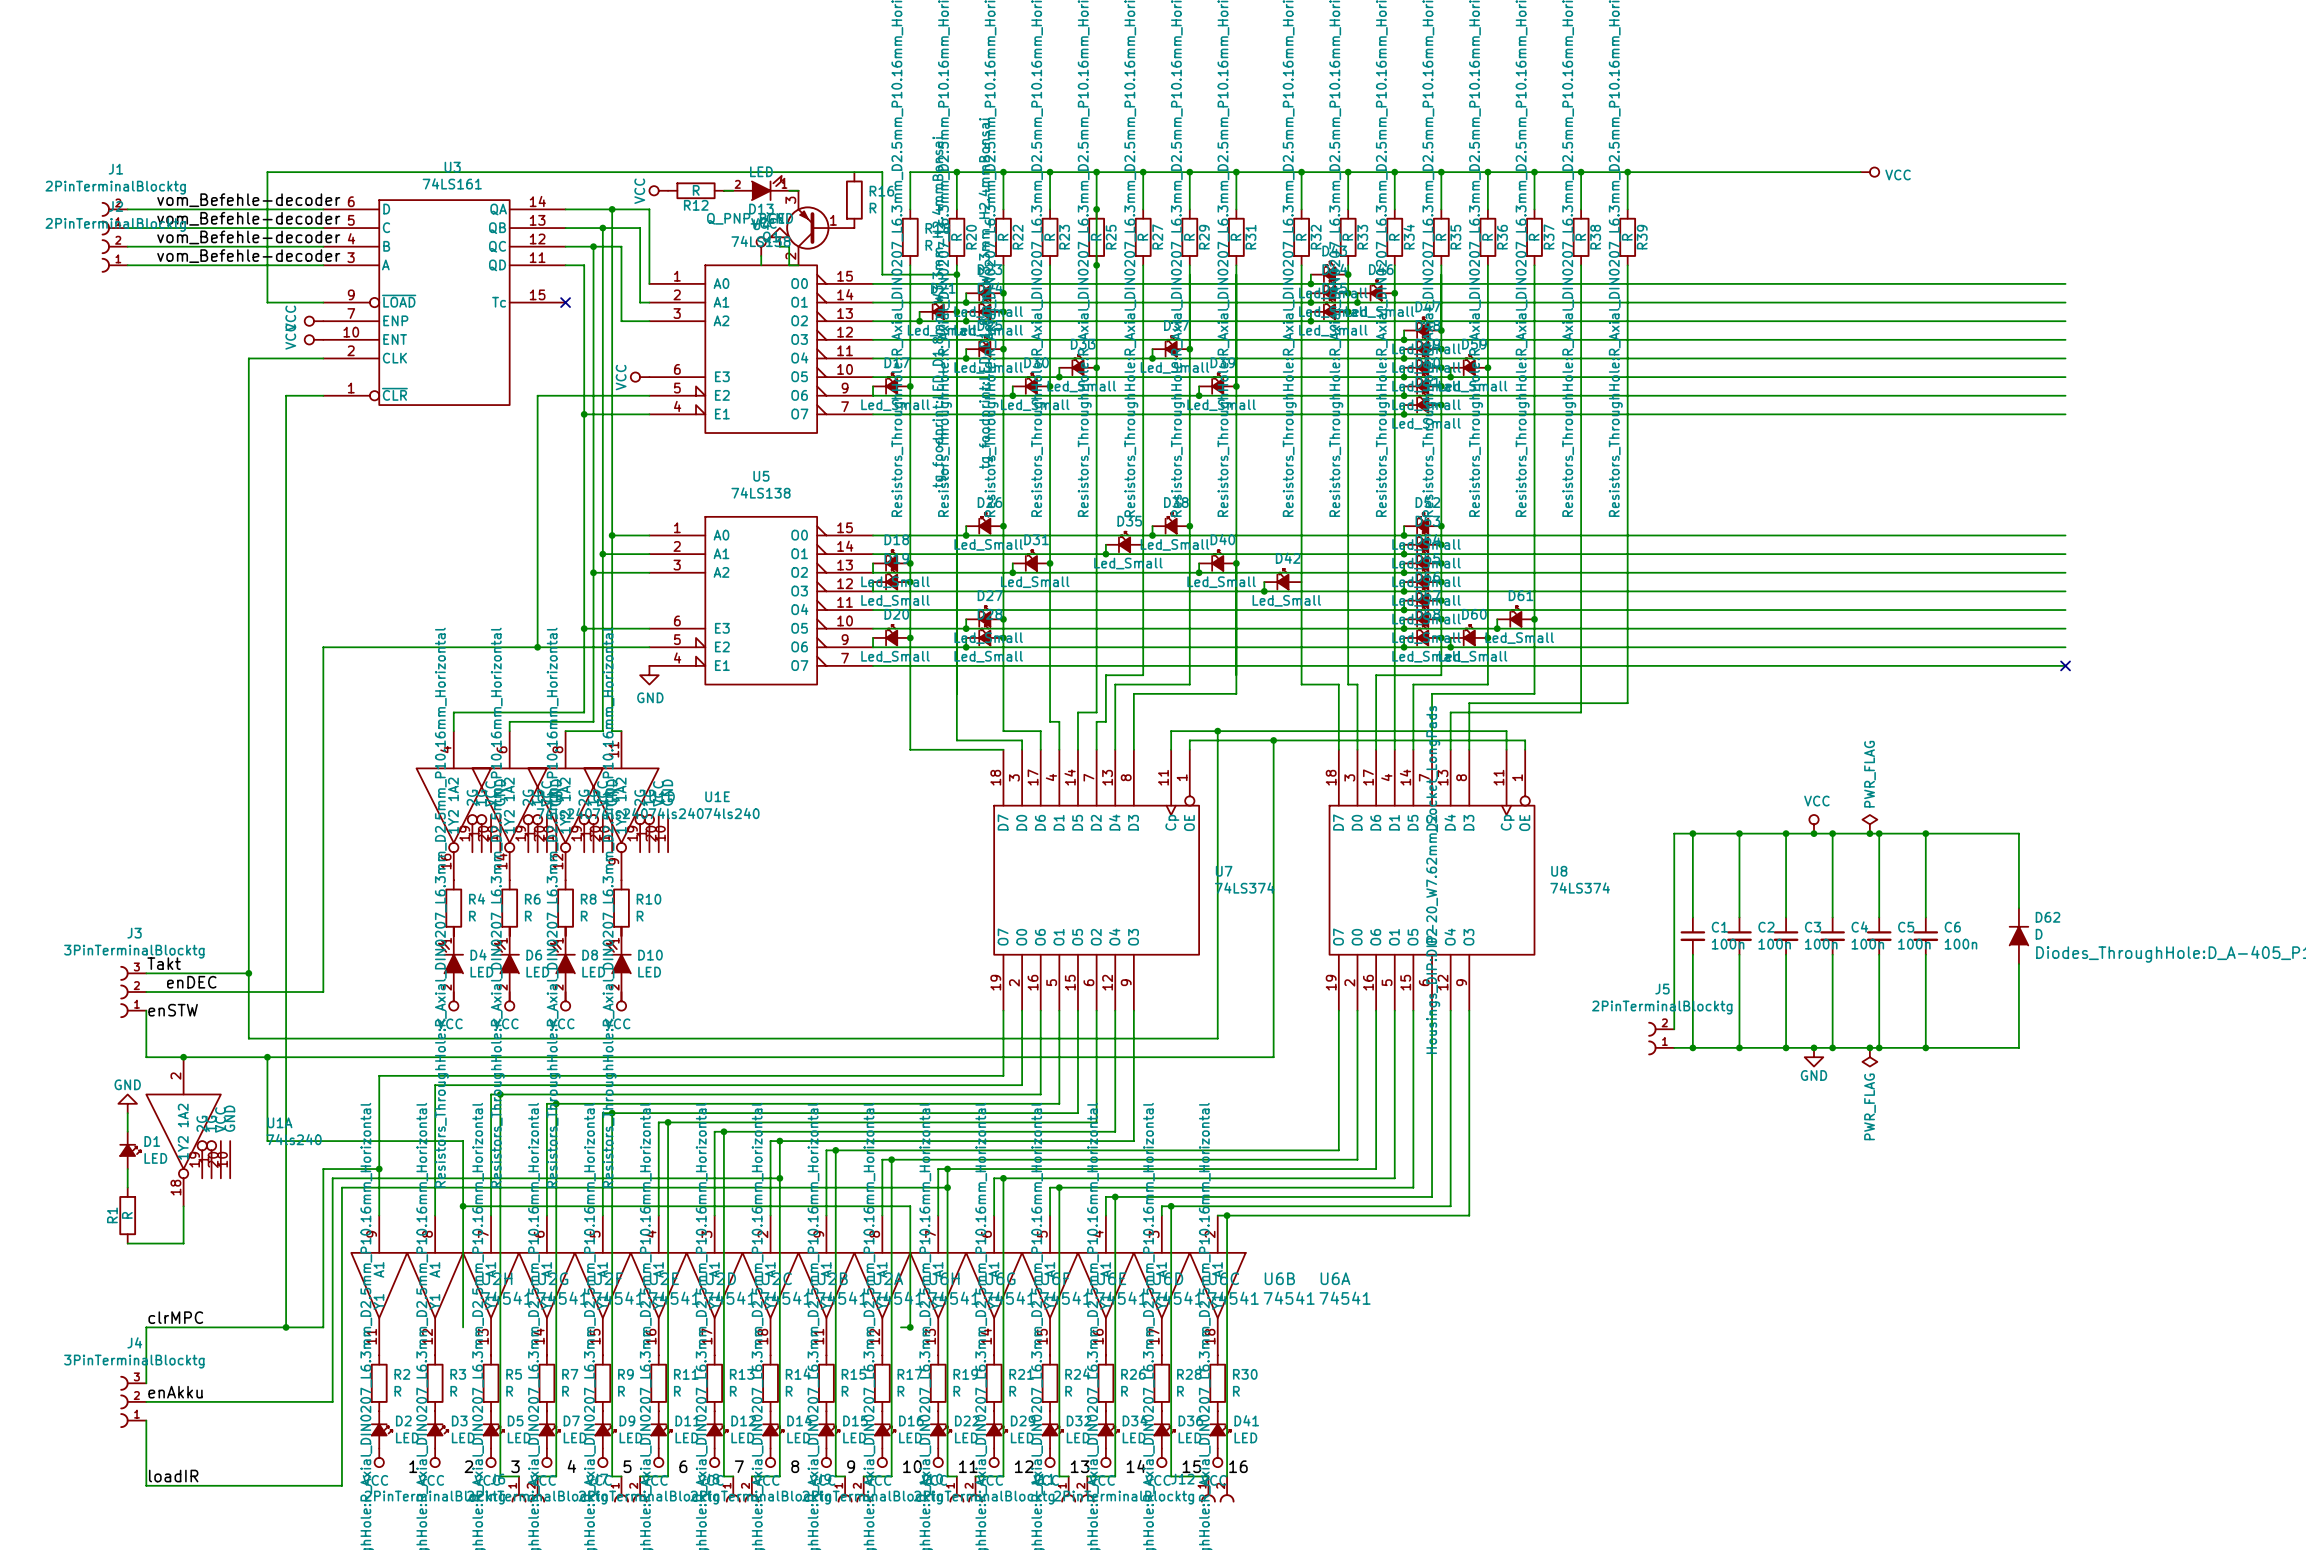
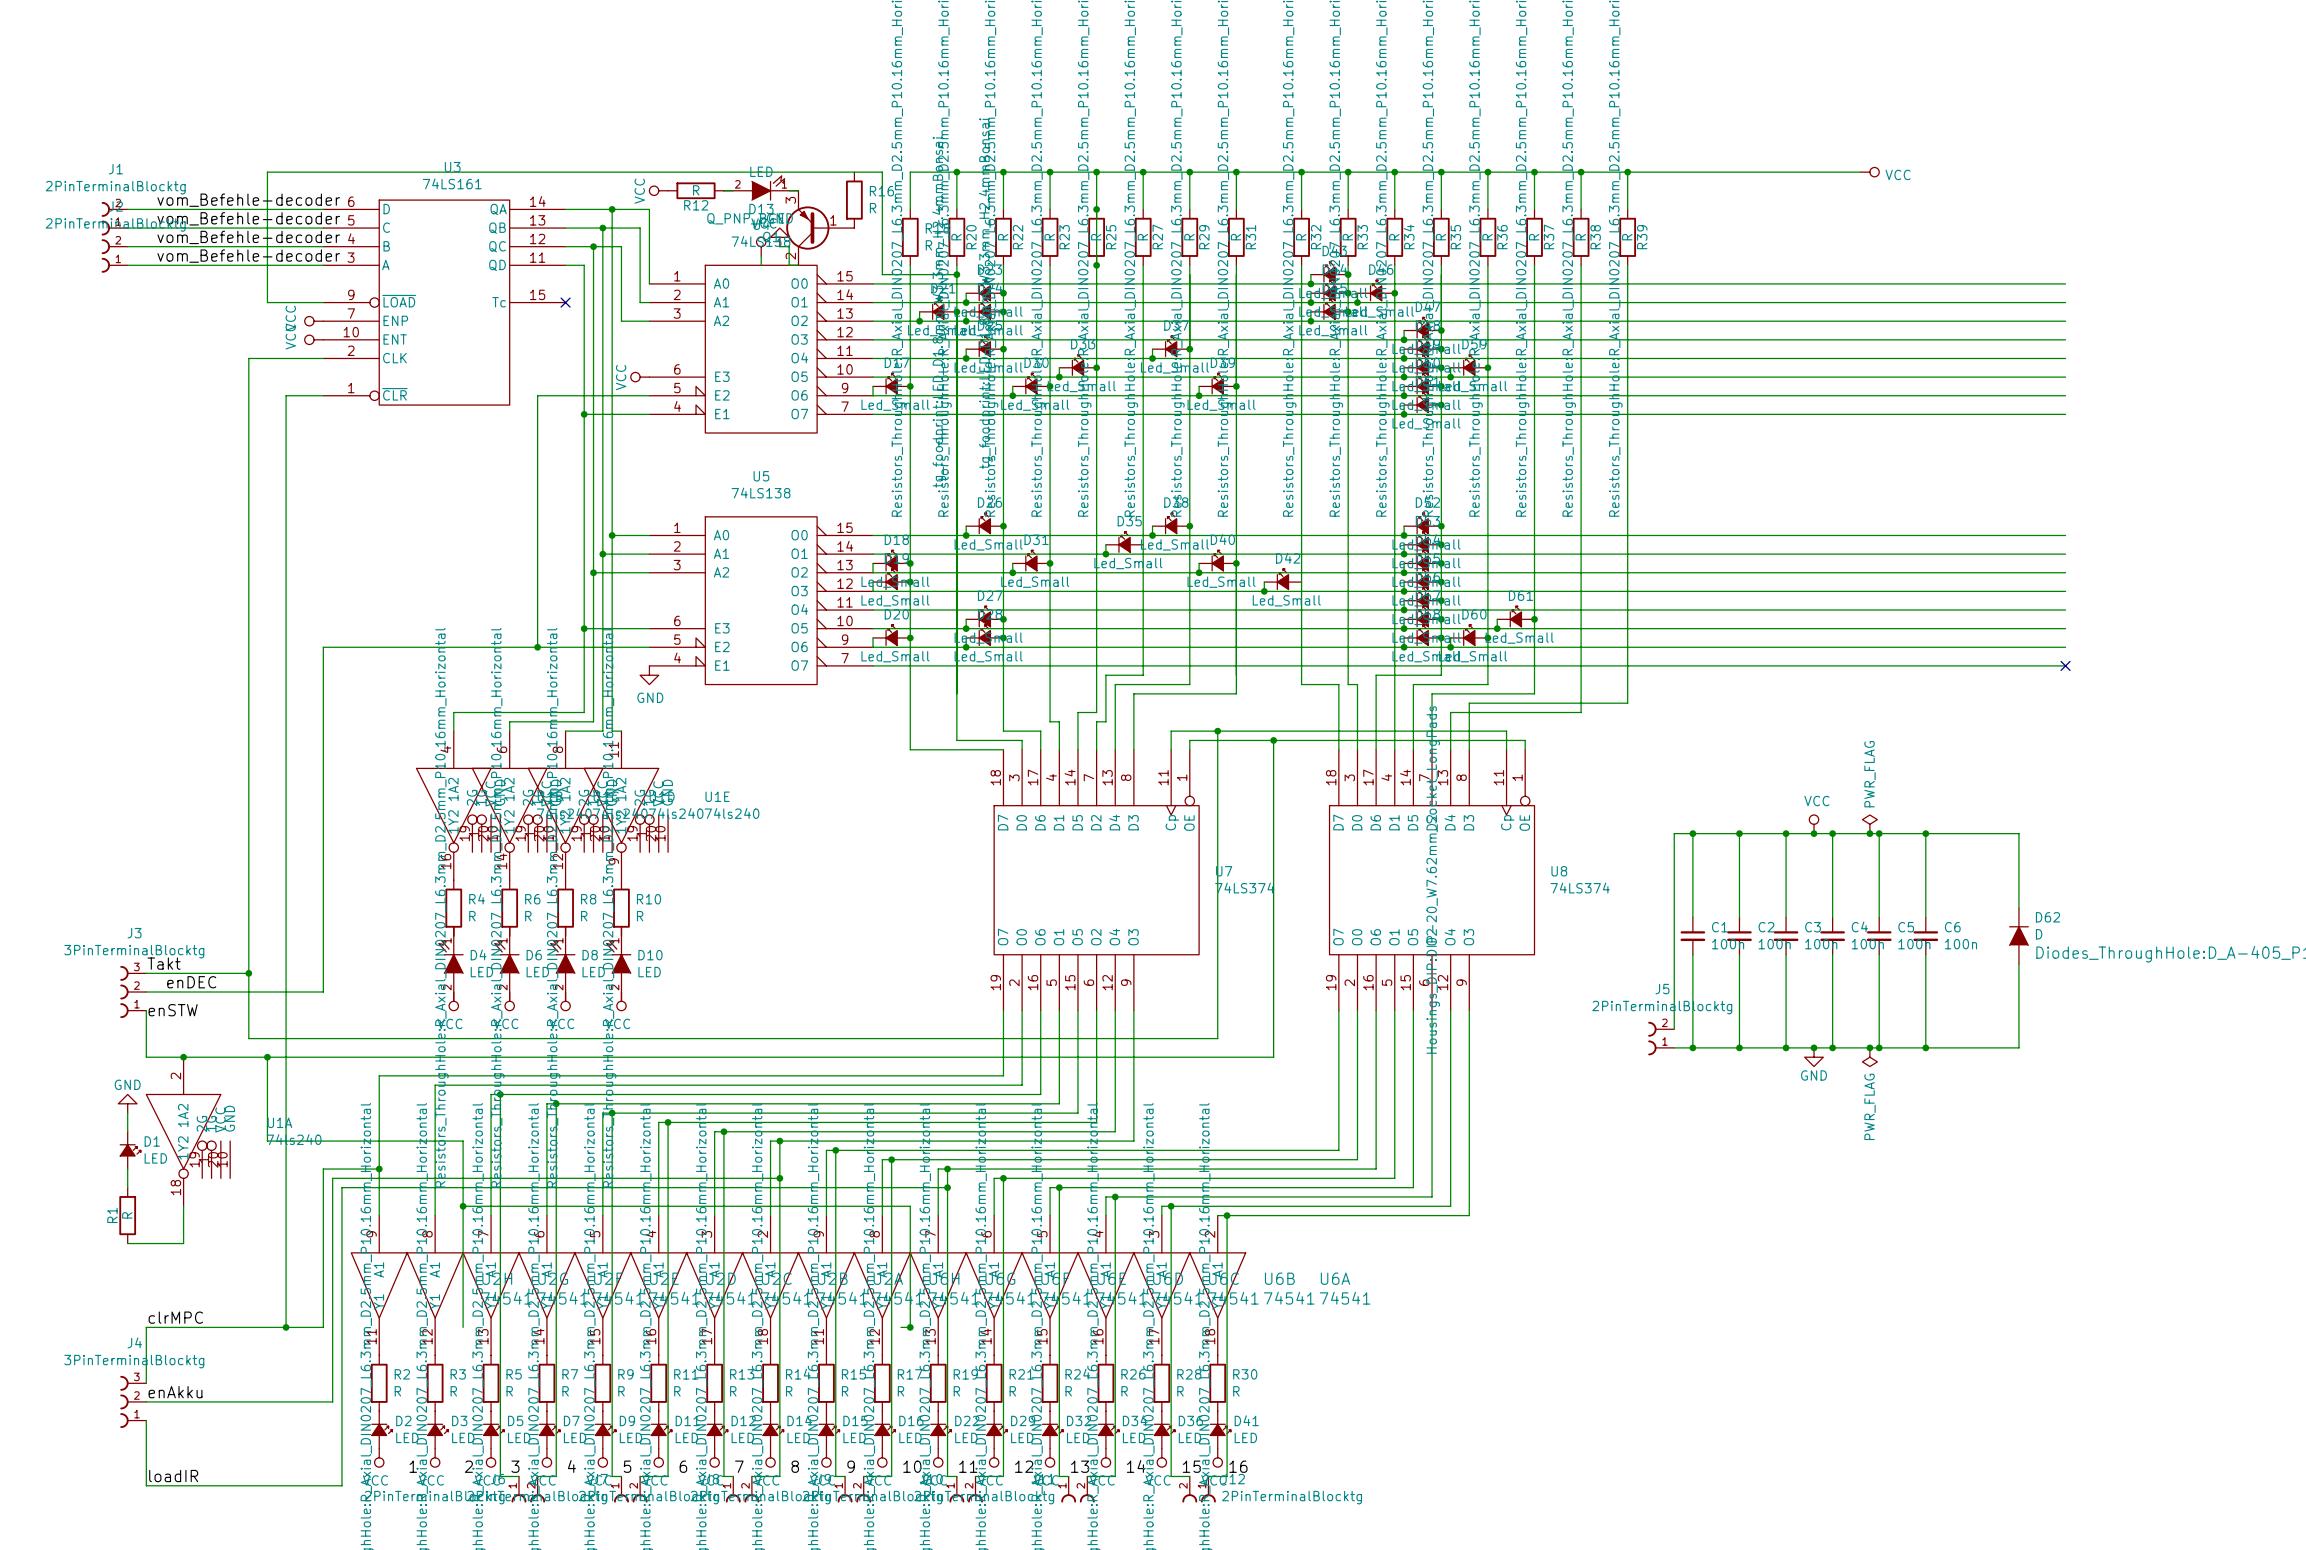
wire: (1189, 1476) (1208, 1476) -> (1227, 1476) (1208, 1476)
J12 flip: as is (1217, 1498) -> left-right (1199, 1498)

